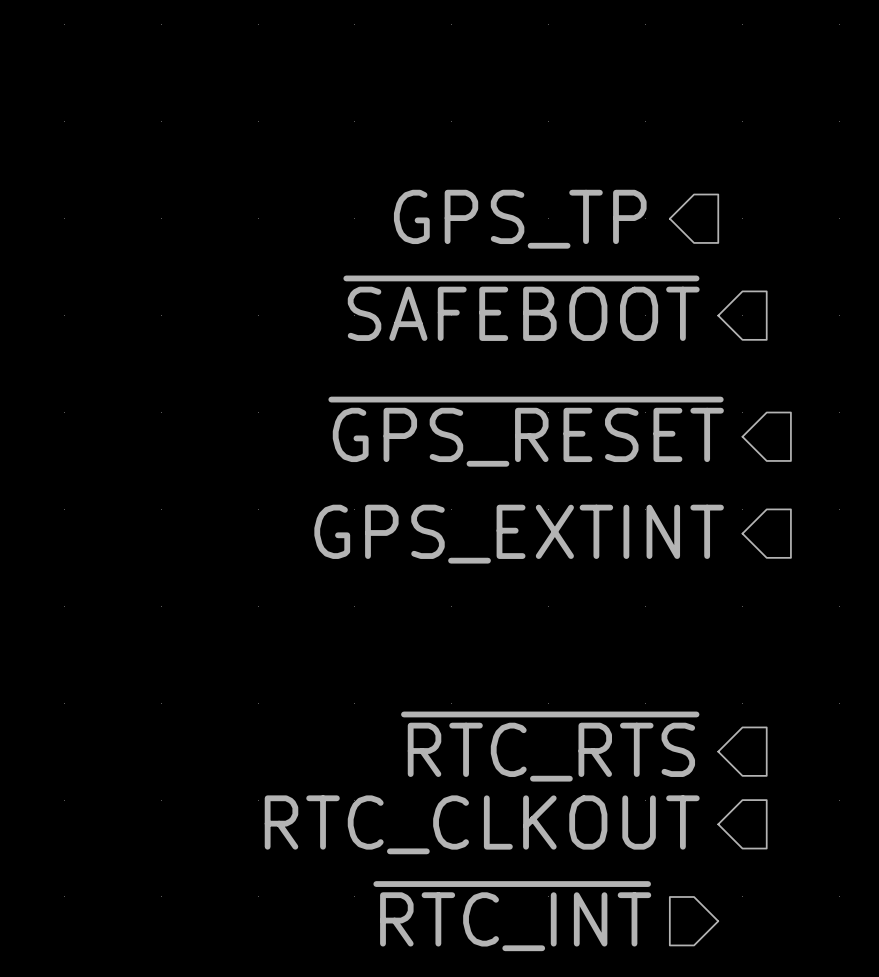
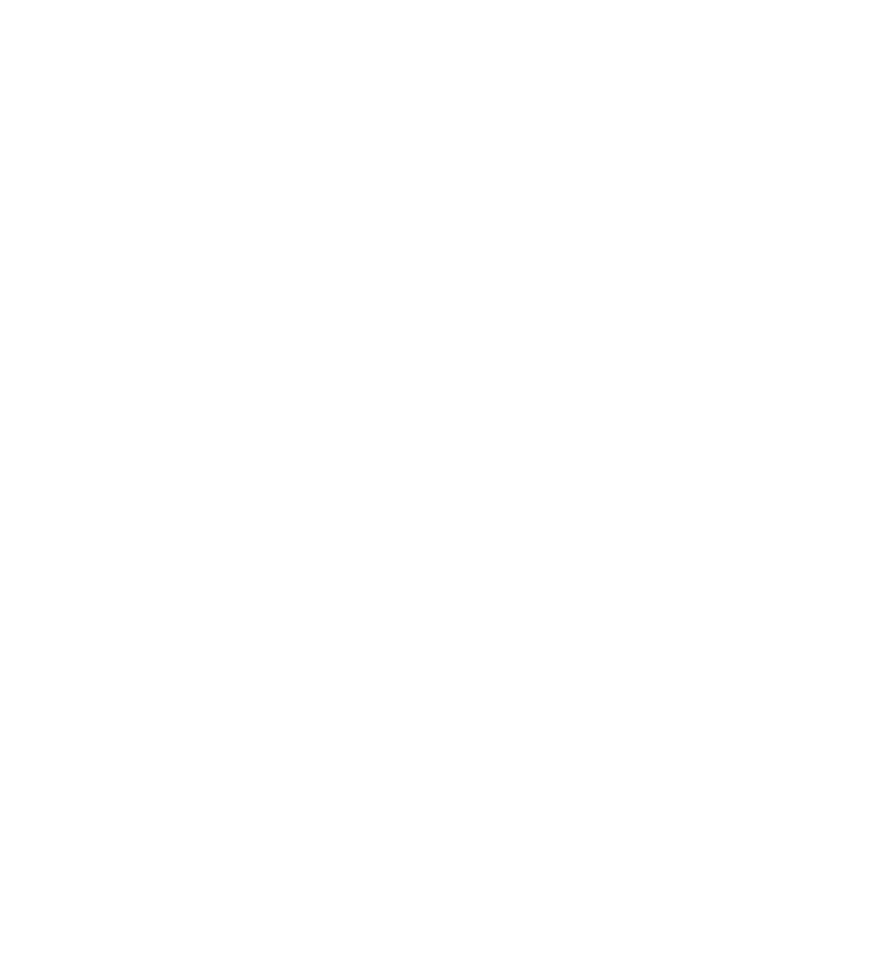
hierarchical label: GPS_TP (520, 219) -> none
hierarchical label: ~{SAFEBOOT} (521, 308) -> none
hierarchical label: ~{GPS_RESET} (526, 431) -> none
hierarchical label: GPS_EXTINT (519, 534) -> none
hierarchical label: ~{RTC_RTS} (550, 746) -> none
hierarchical label: RTC_CLKOUT (482, 824) -> none
hierarchical label: ~{RTC_INT} (512, 916) -> none

